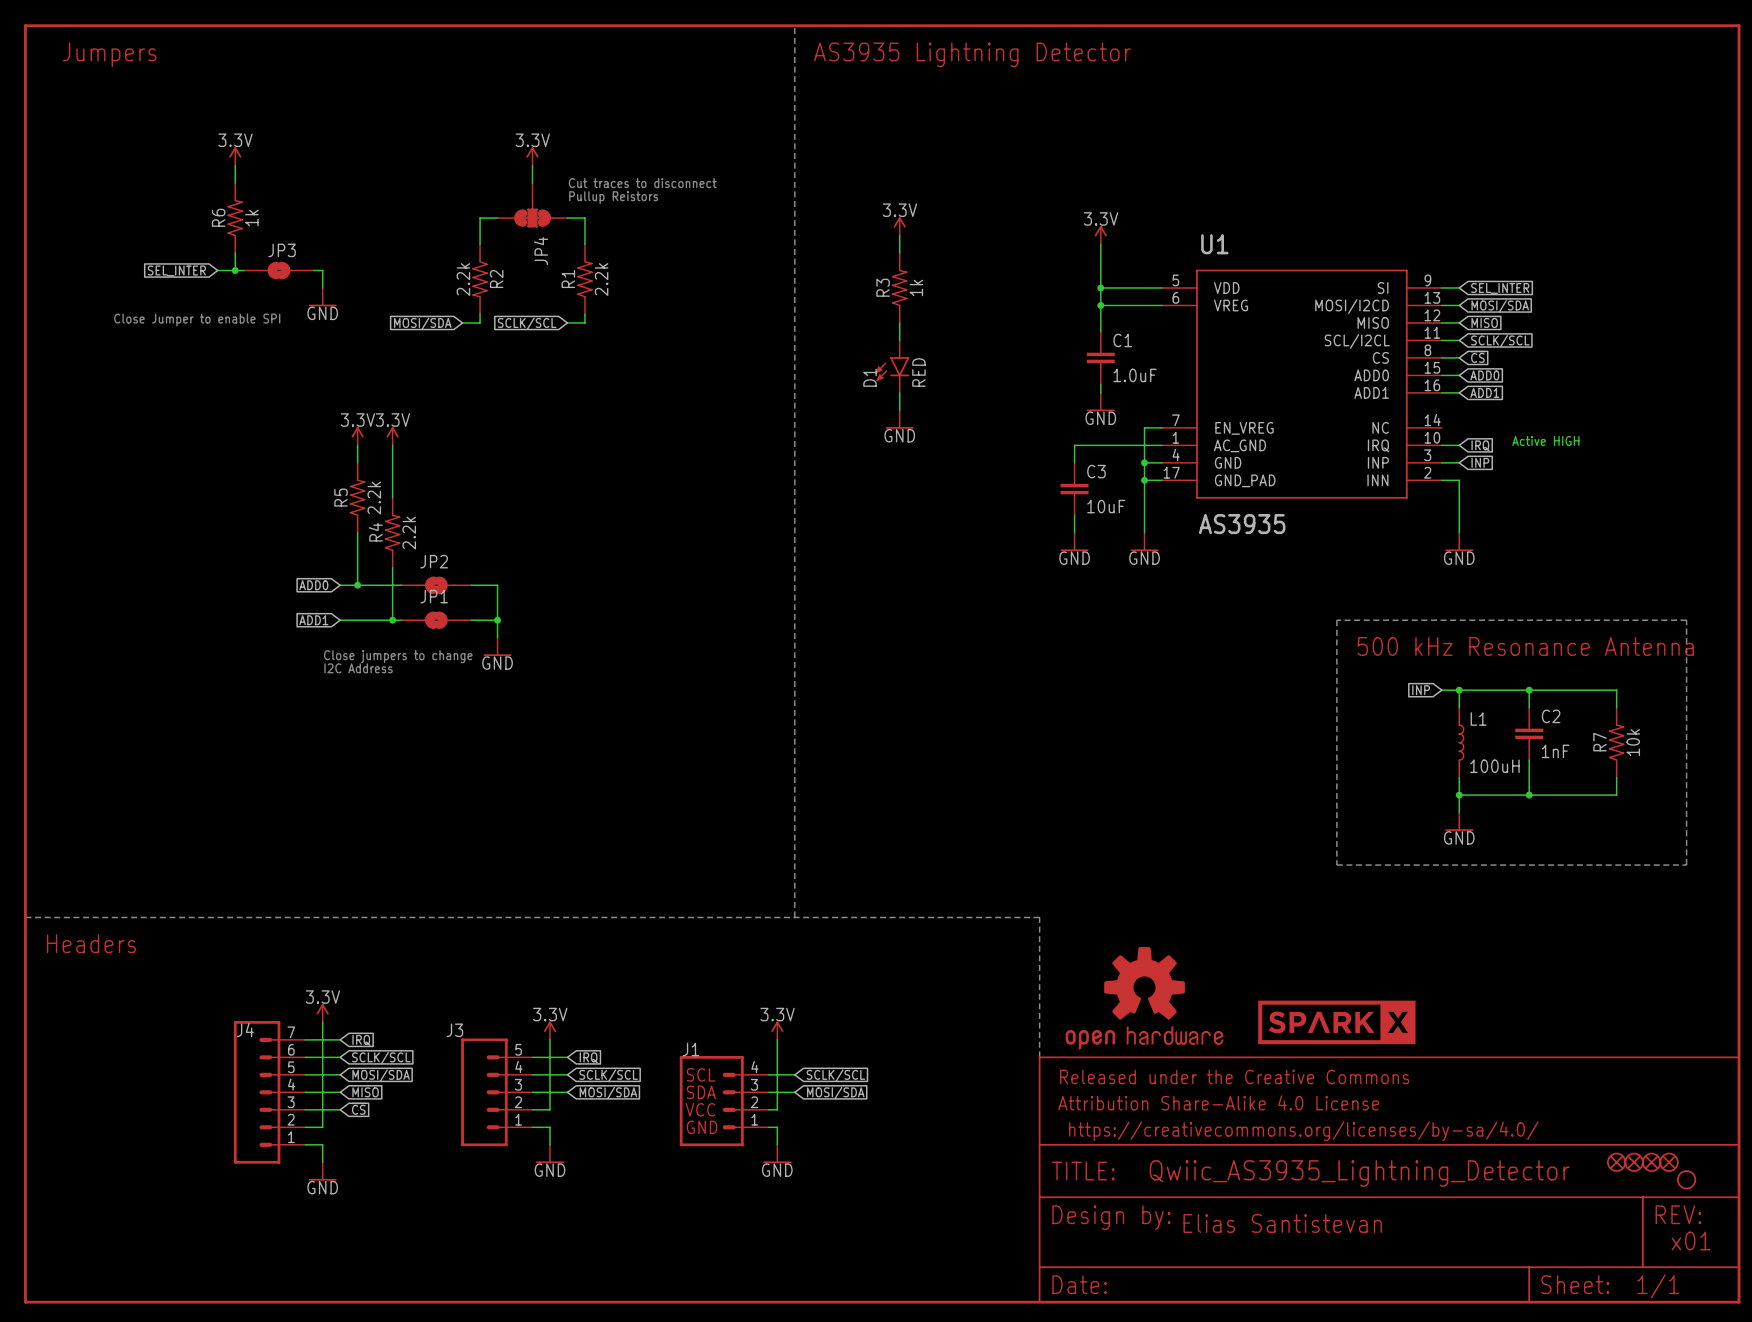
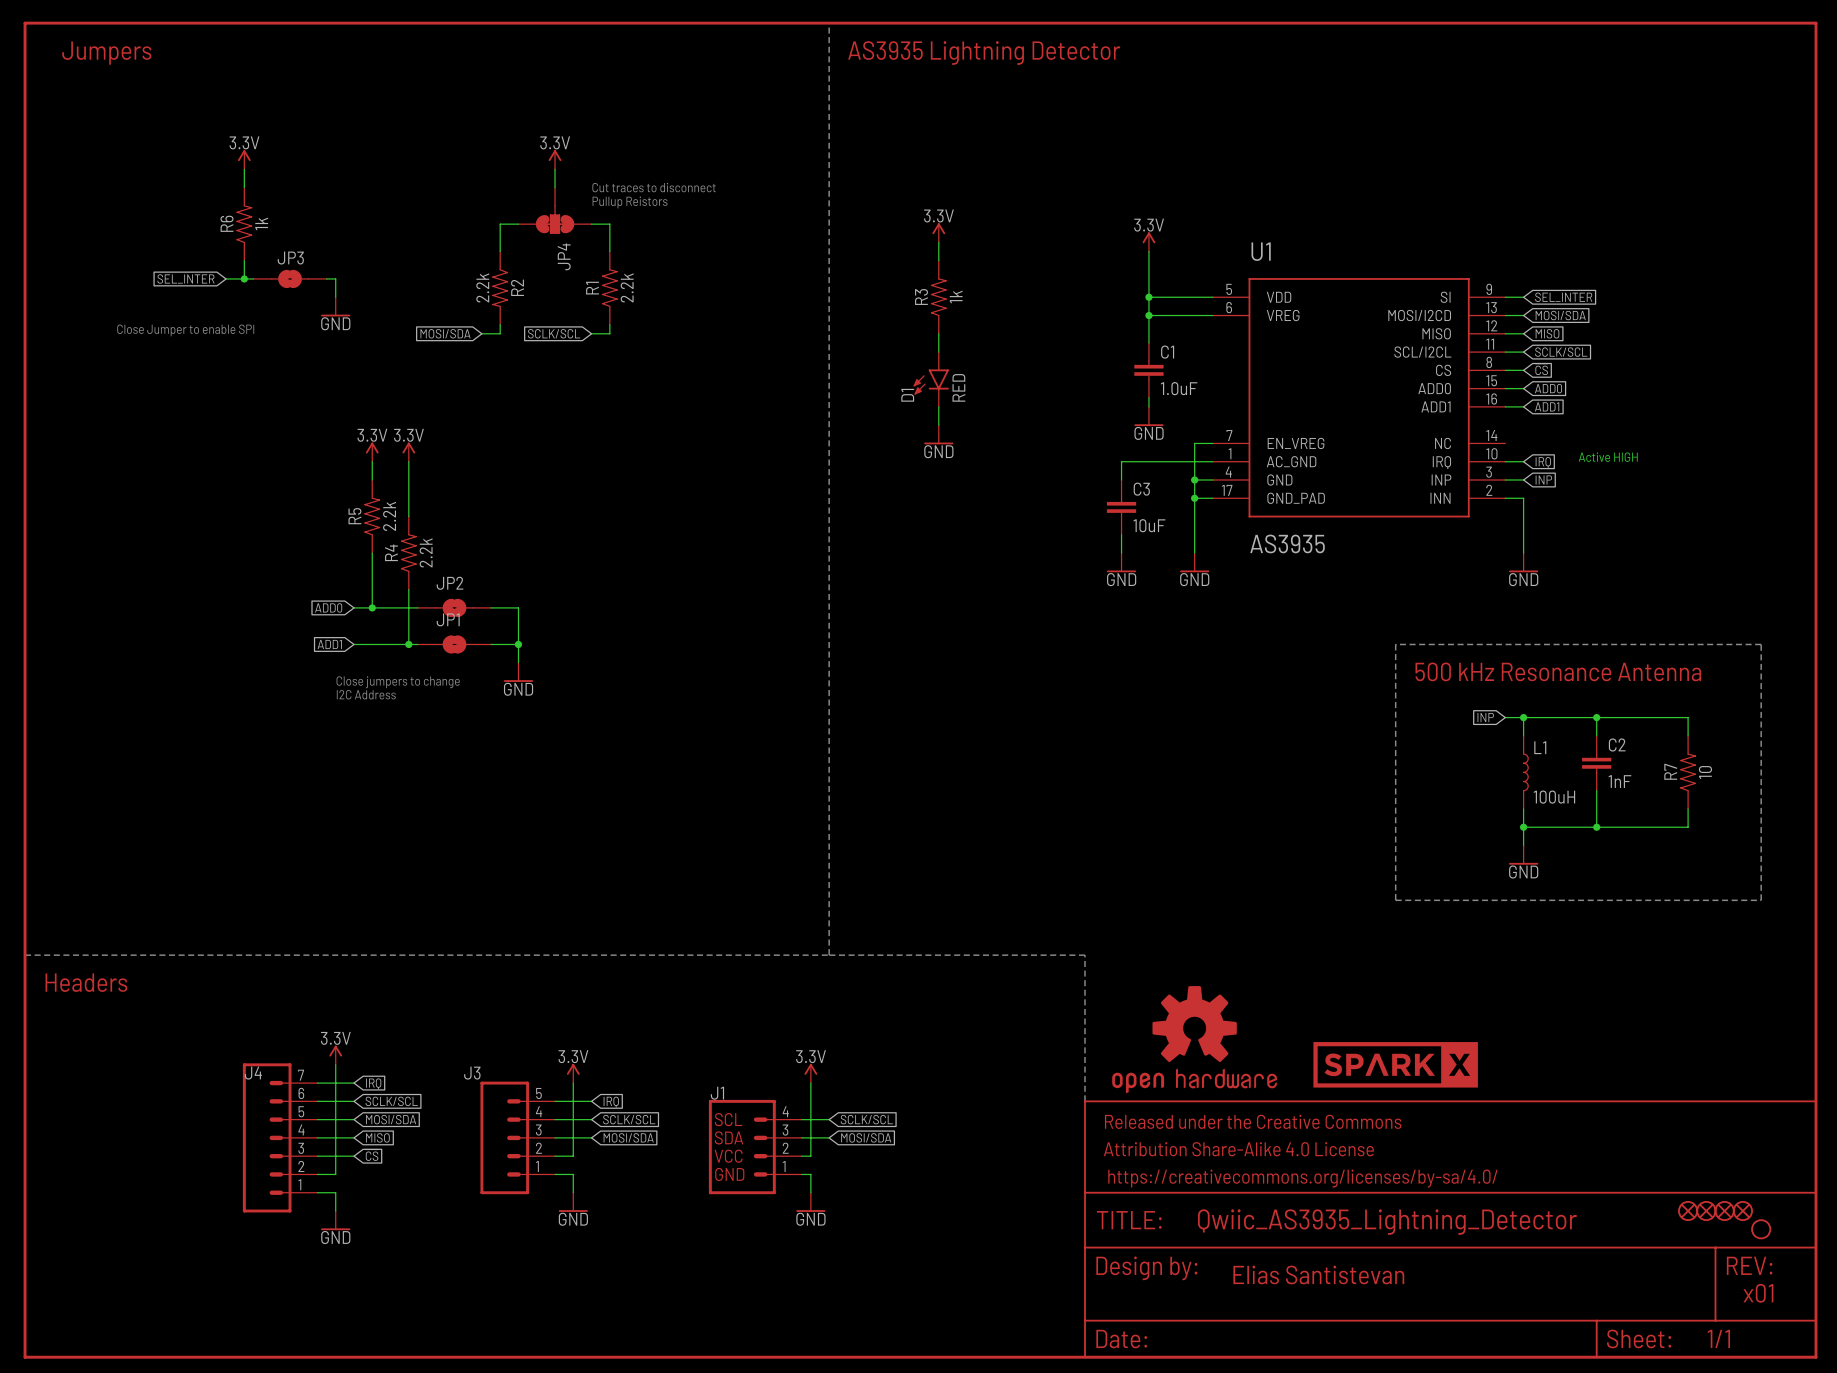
R7 value: 10k (1633, 742) -> 10 (1705, 772)

